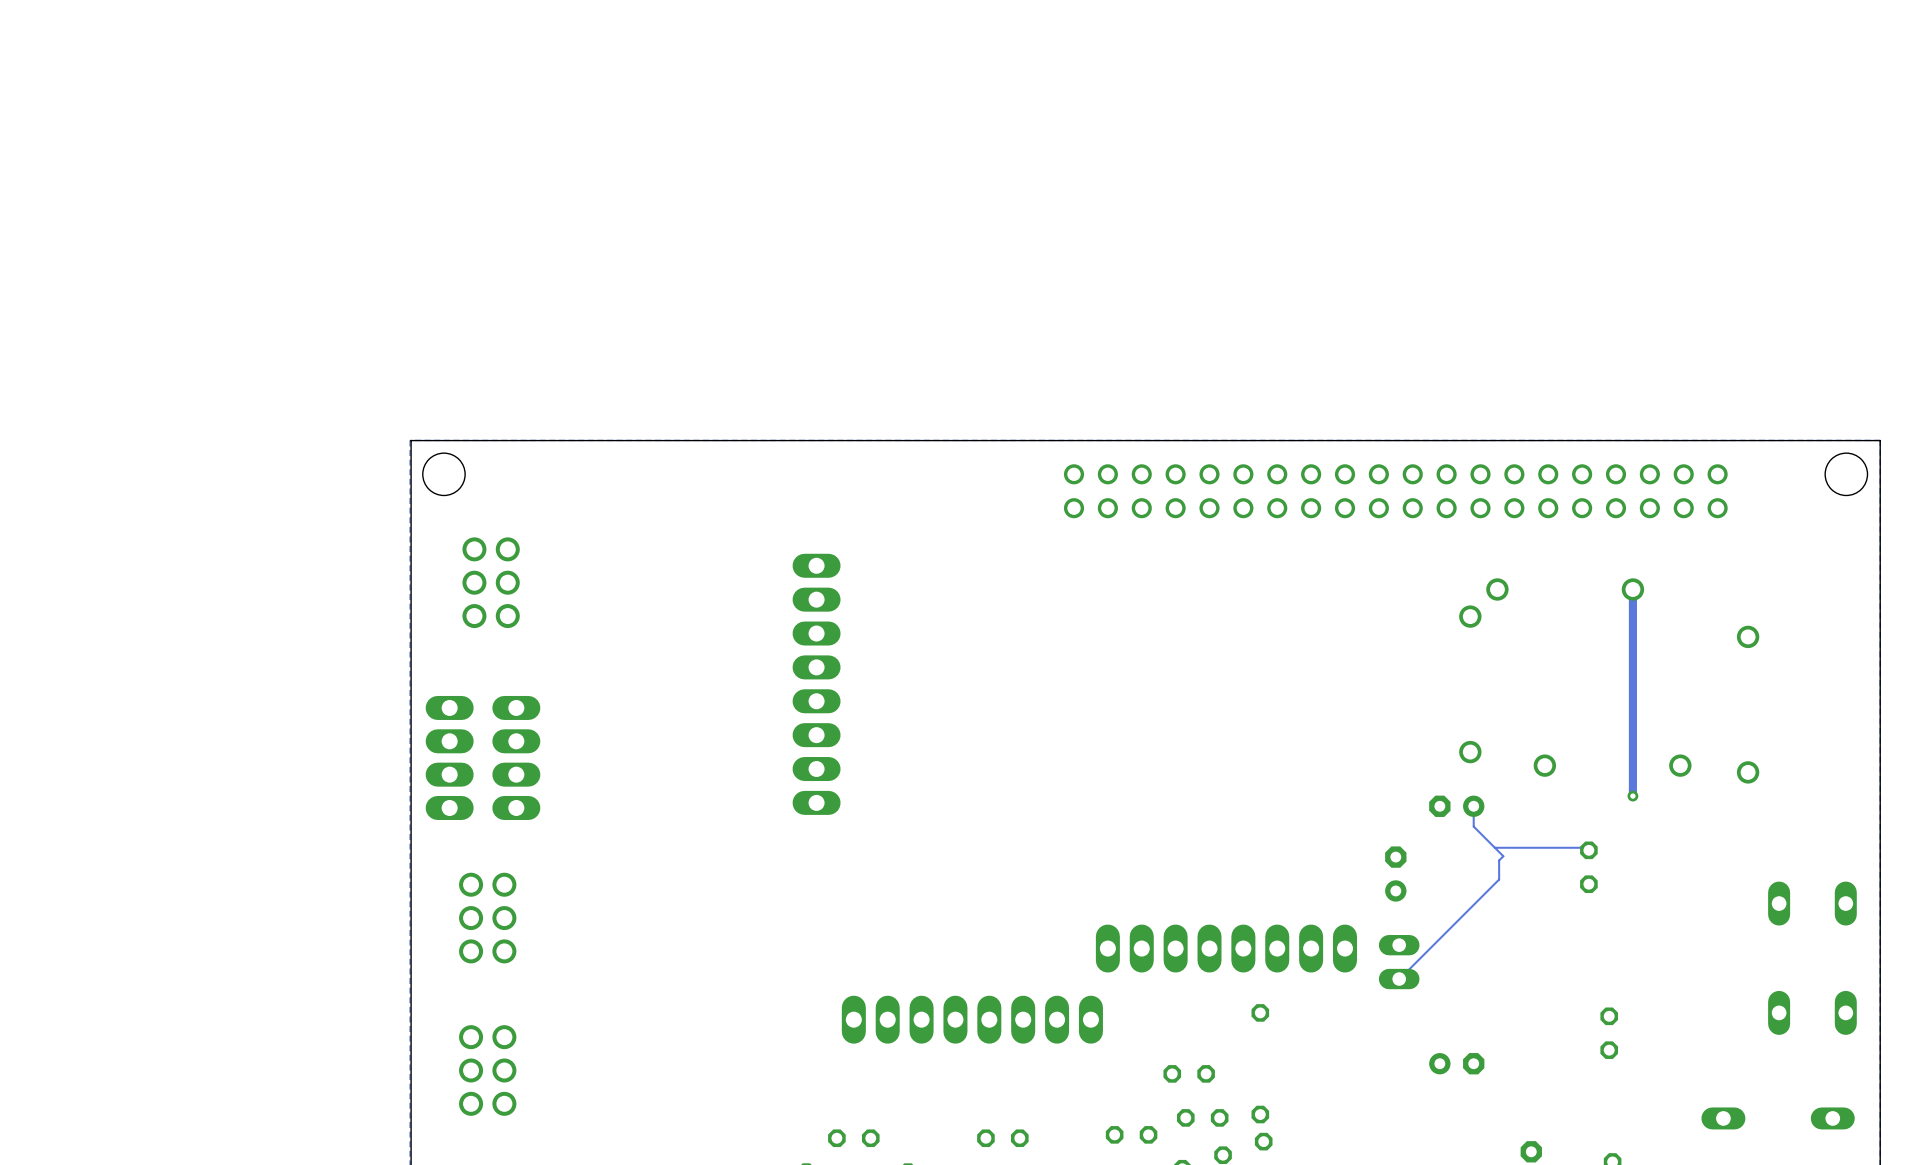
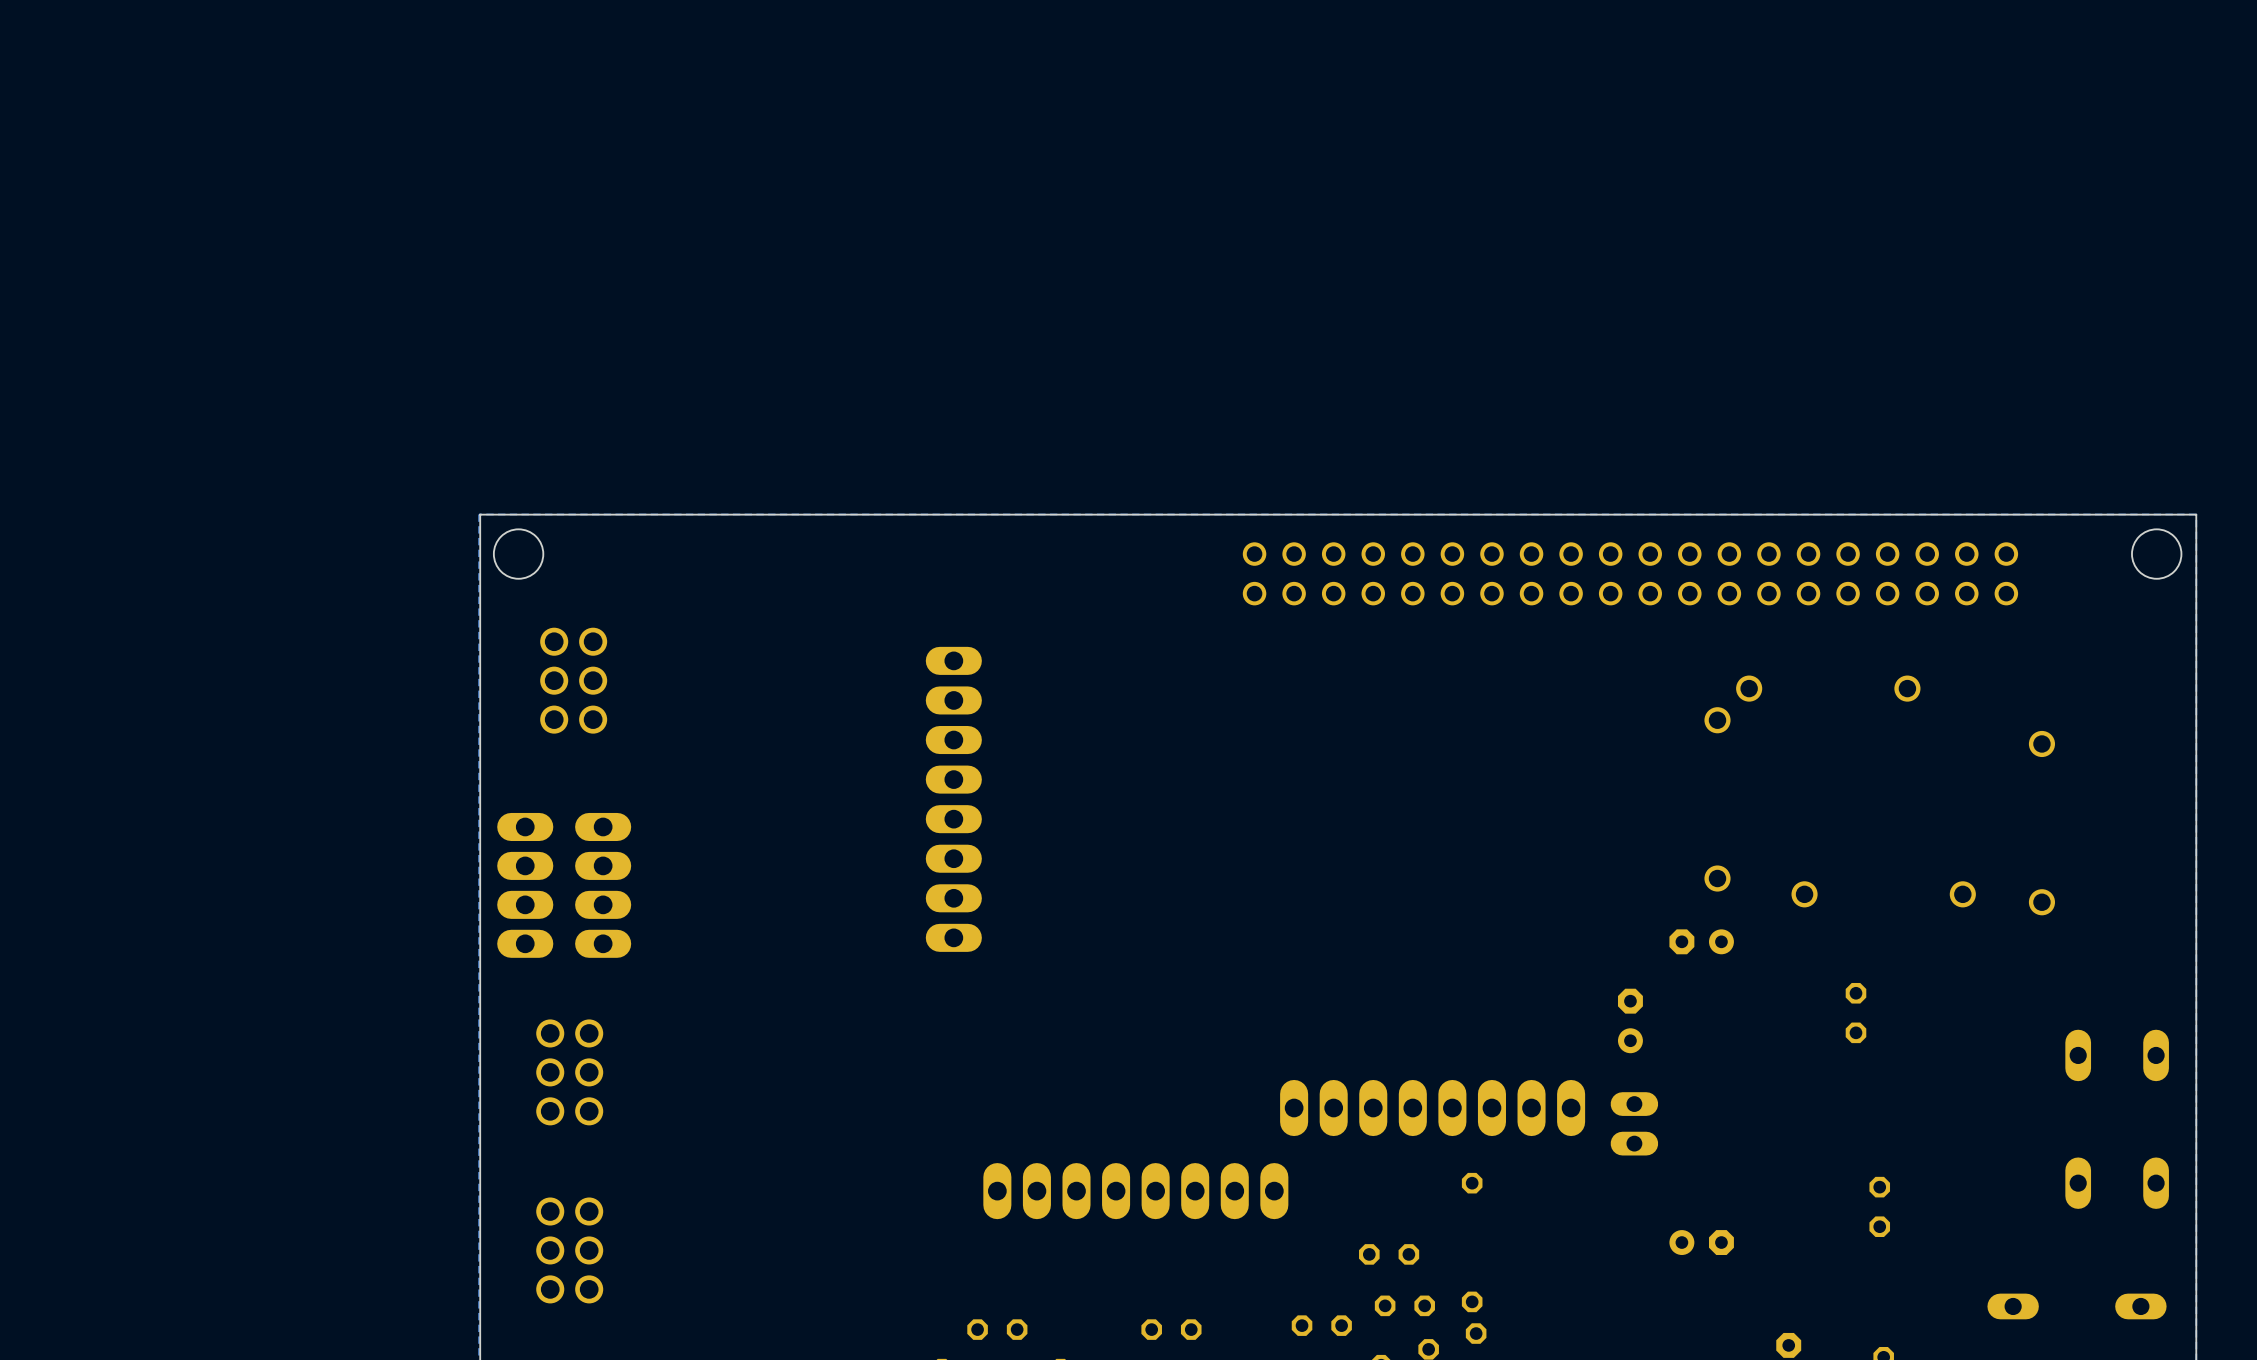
track: (1632, 589) (1632, 796) -> none
via: (1632, 796) -> none
track: (1473, 806) (1473, 826) (1503, 856) (1499, 860) (1499, 879) (1399, 979) -> none
track: (1494, 847) (1588, 847) (1588, 850) -> none

